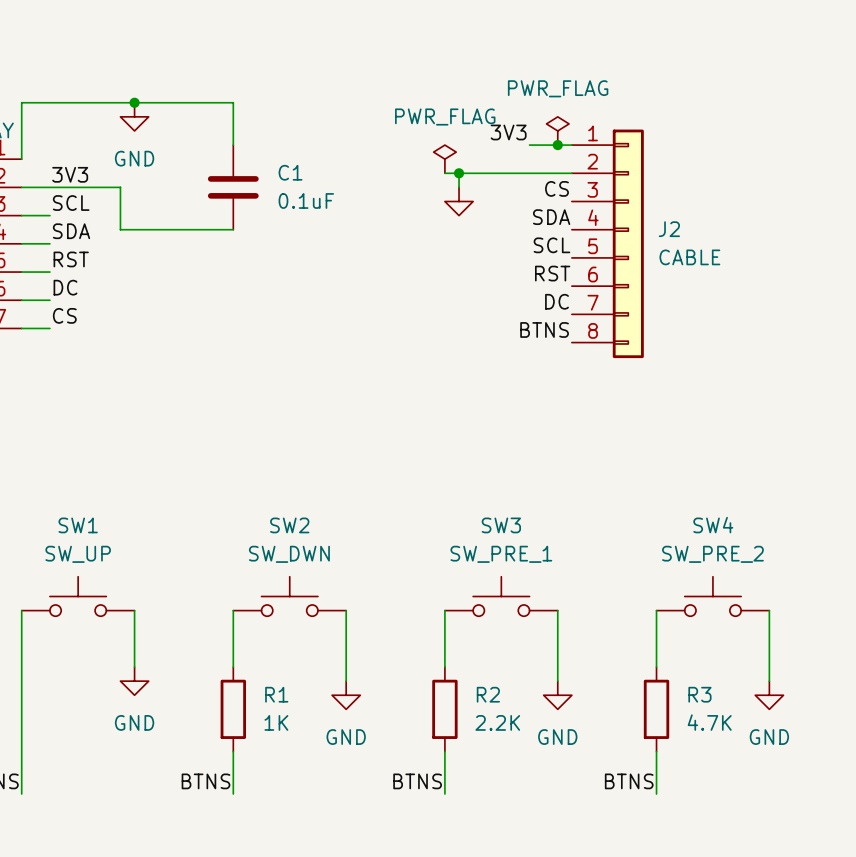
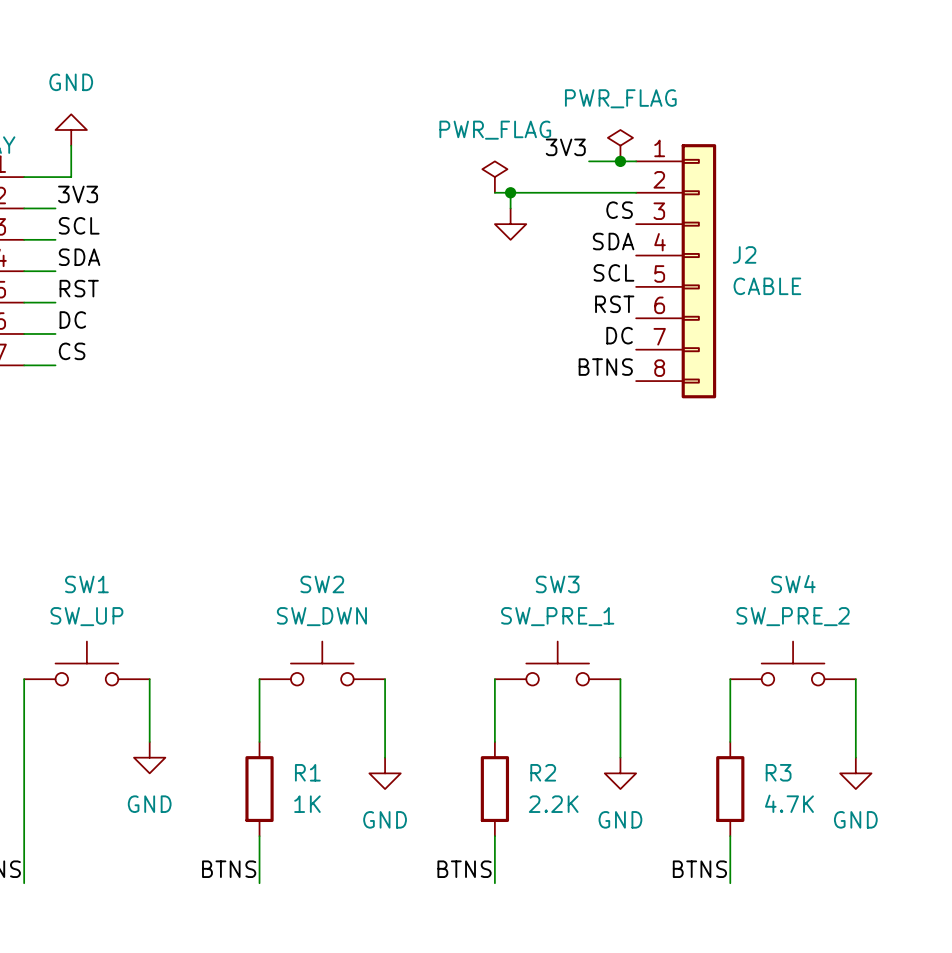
junction: (134, 102) -> none
power symbol rotation: 0° (134, 116) -> 180° (71, 129)
power symbol position: GND (134, 116) -> GND (71, 129)
wire: (233, 145) (233, 102) (21, 102) (21, 159) -> (71, 145) (71, 177) (24, 177)
wire: (49, 187) (120, 187) (120, 229) (233, 229) -> none
C1: 0.1uF (233, 187) -> none

